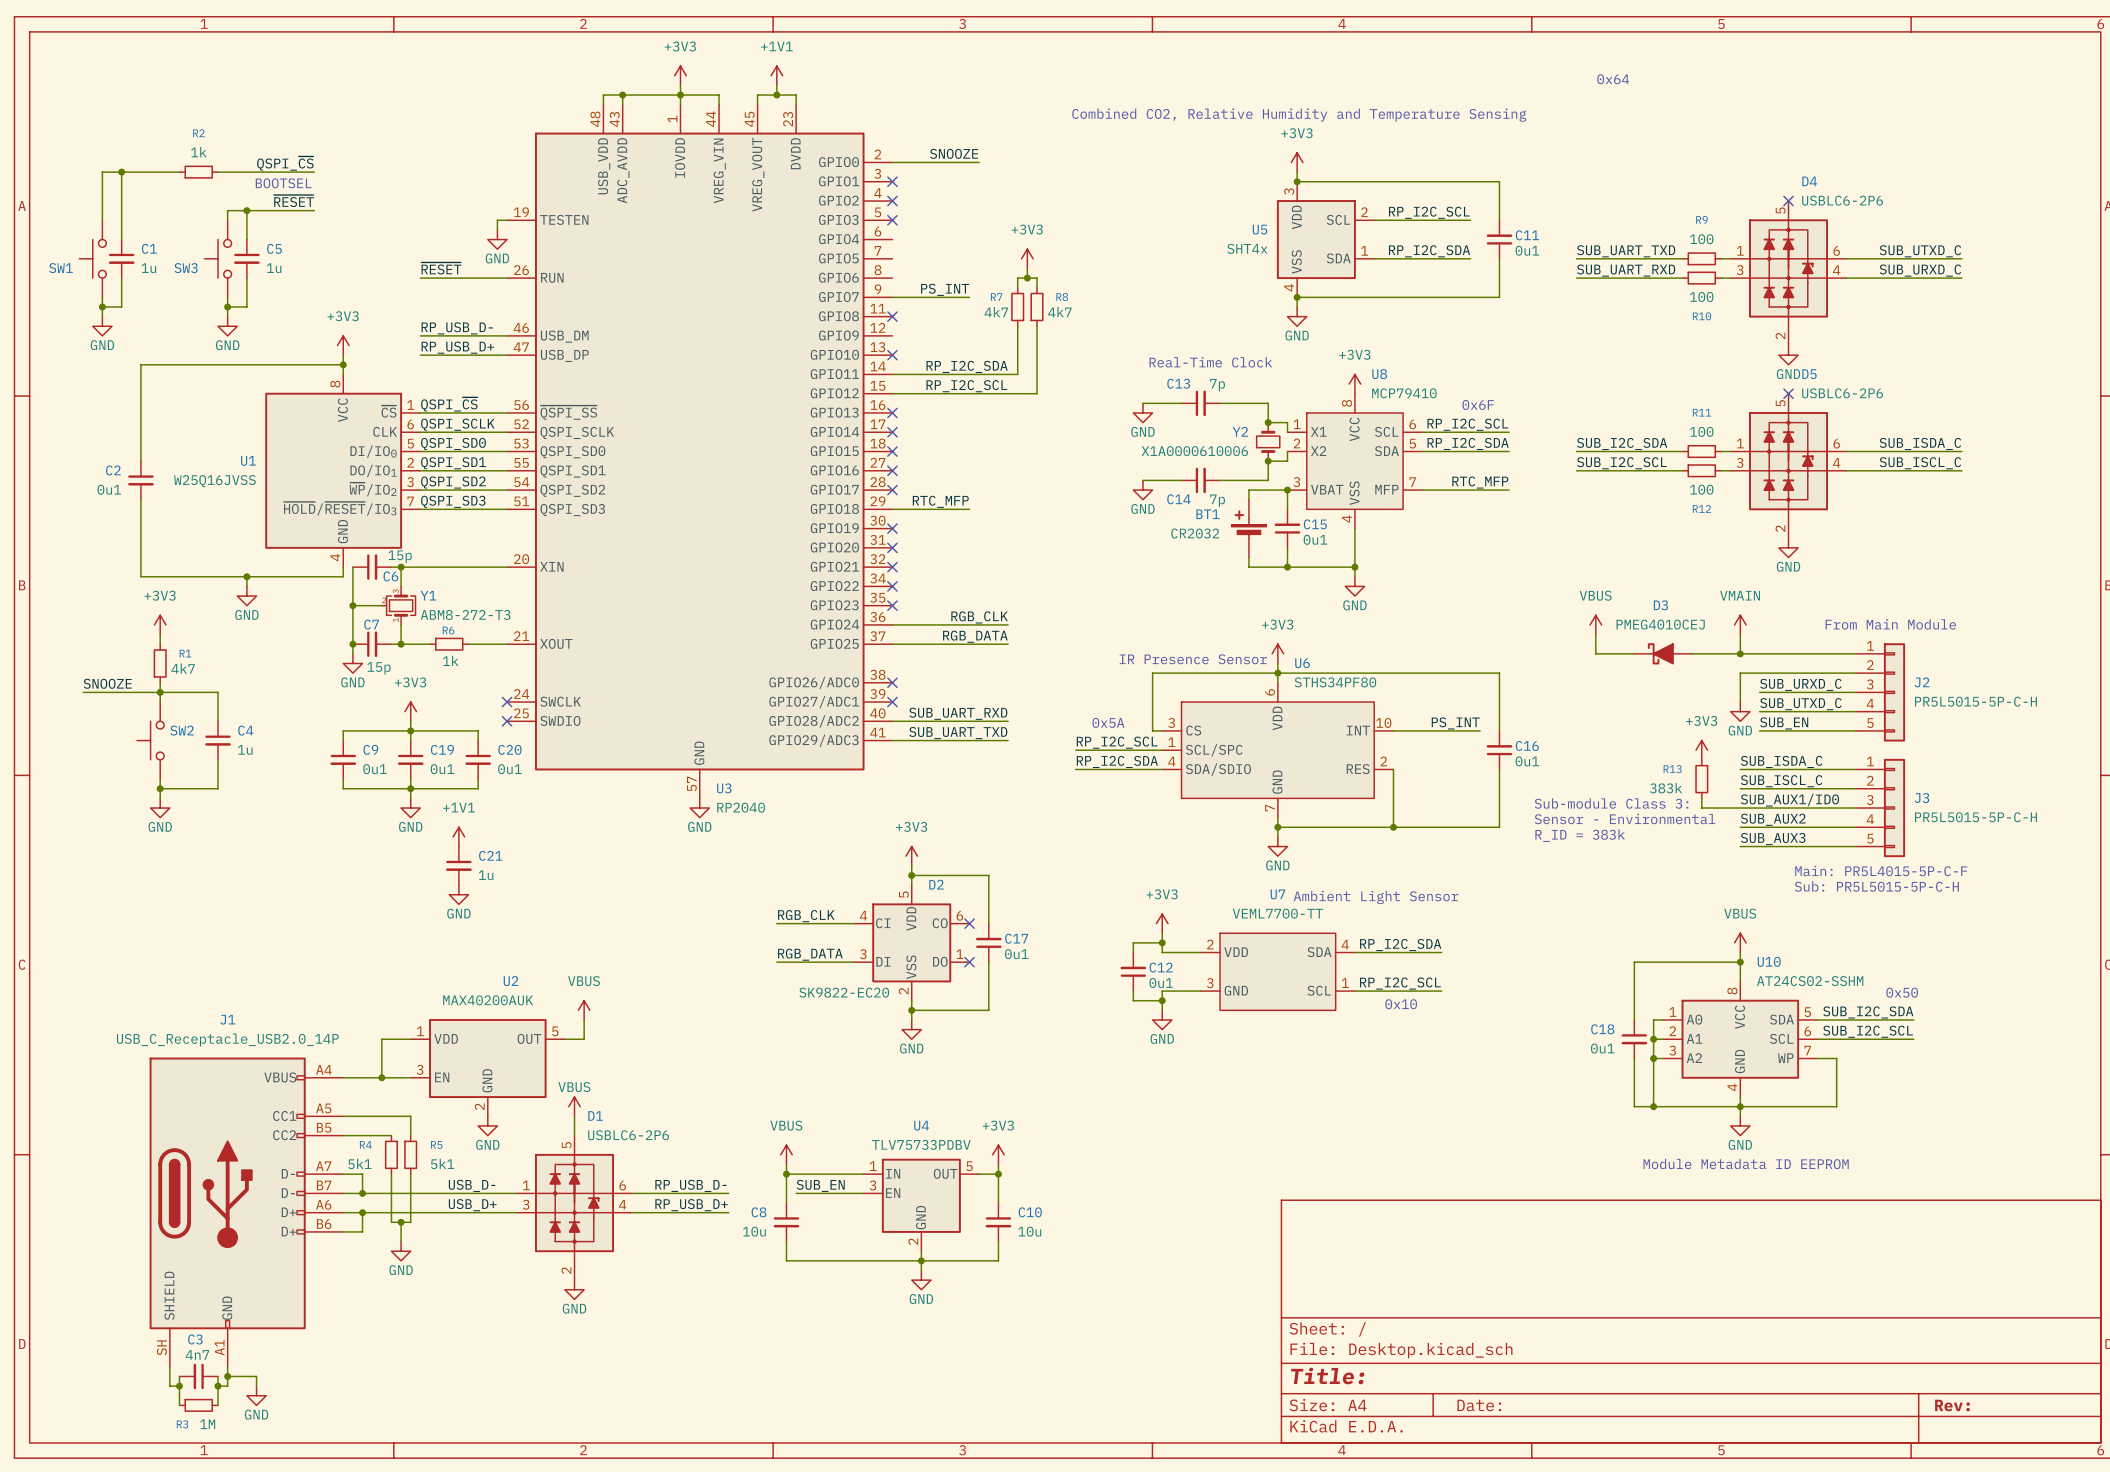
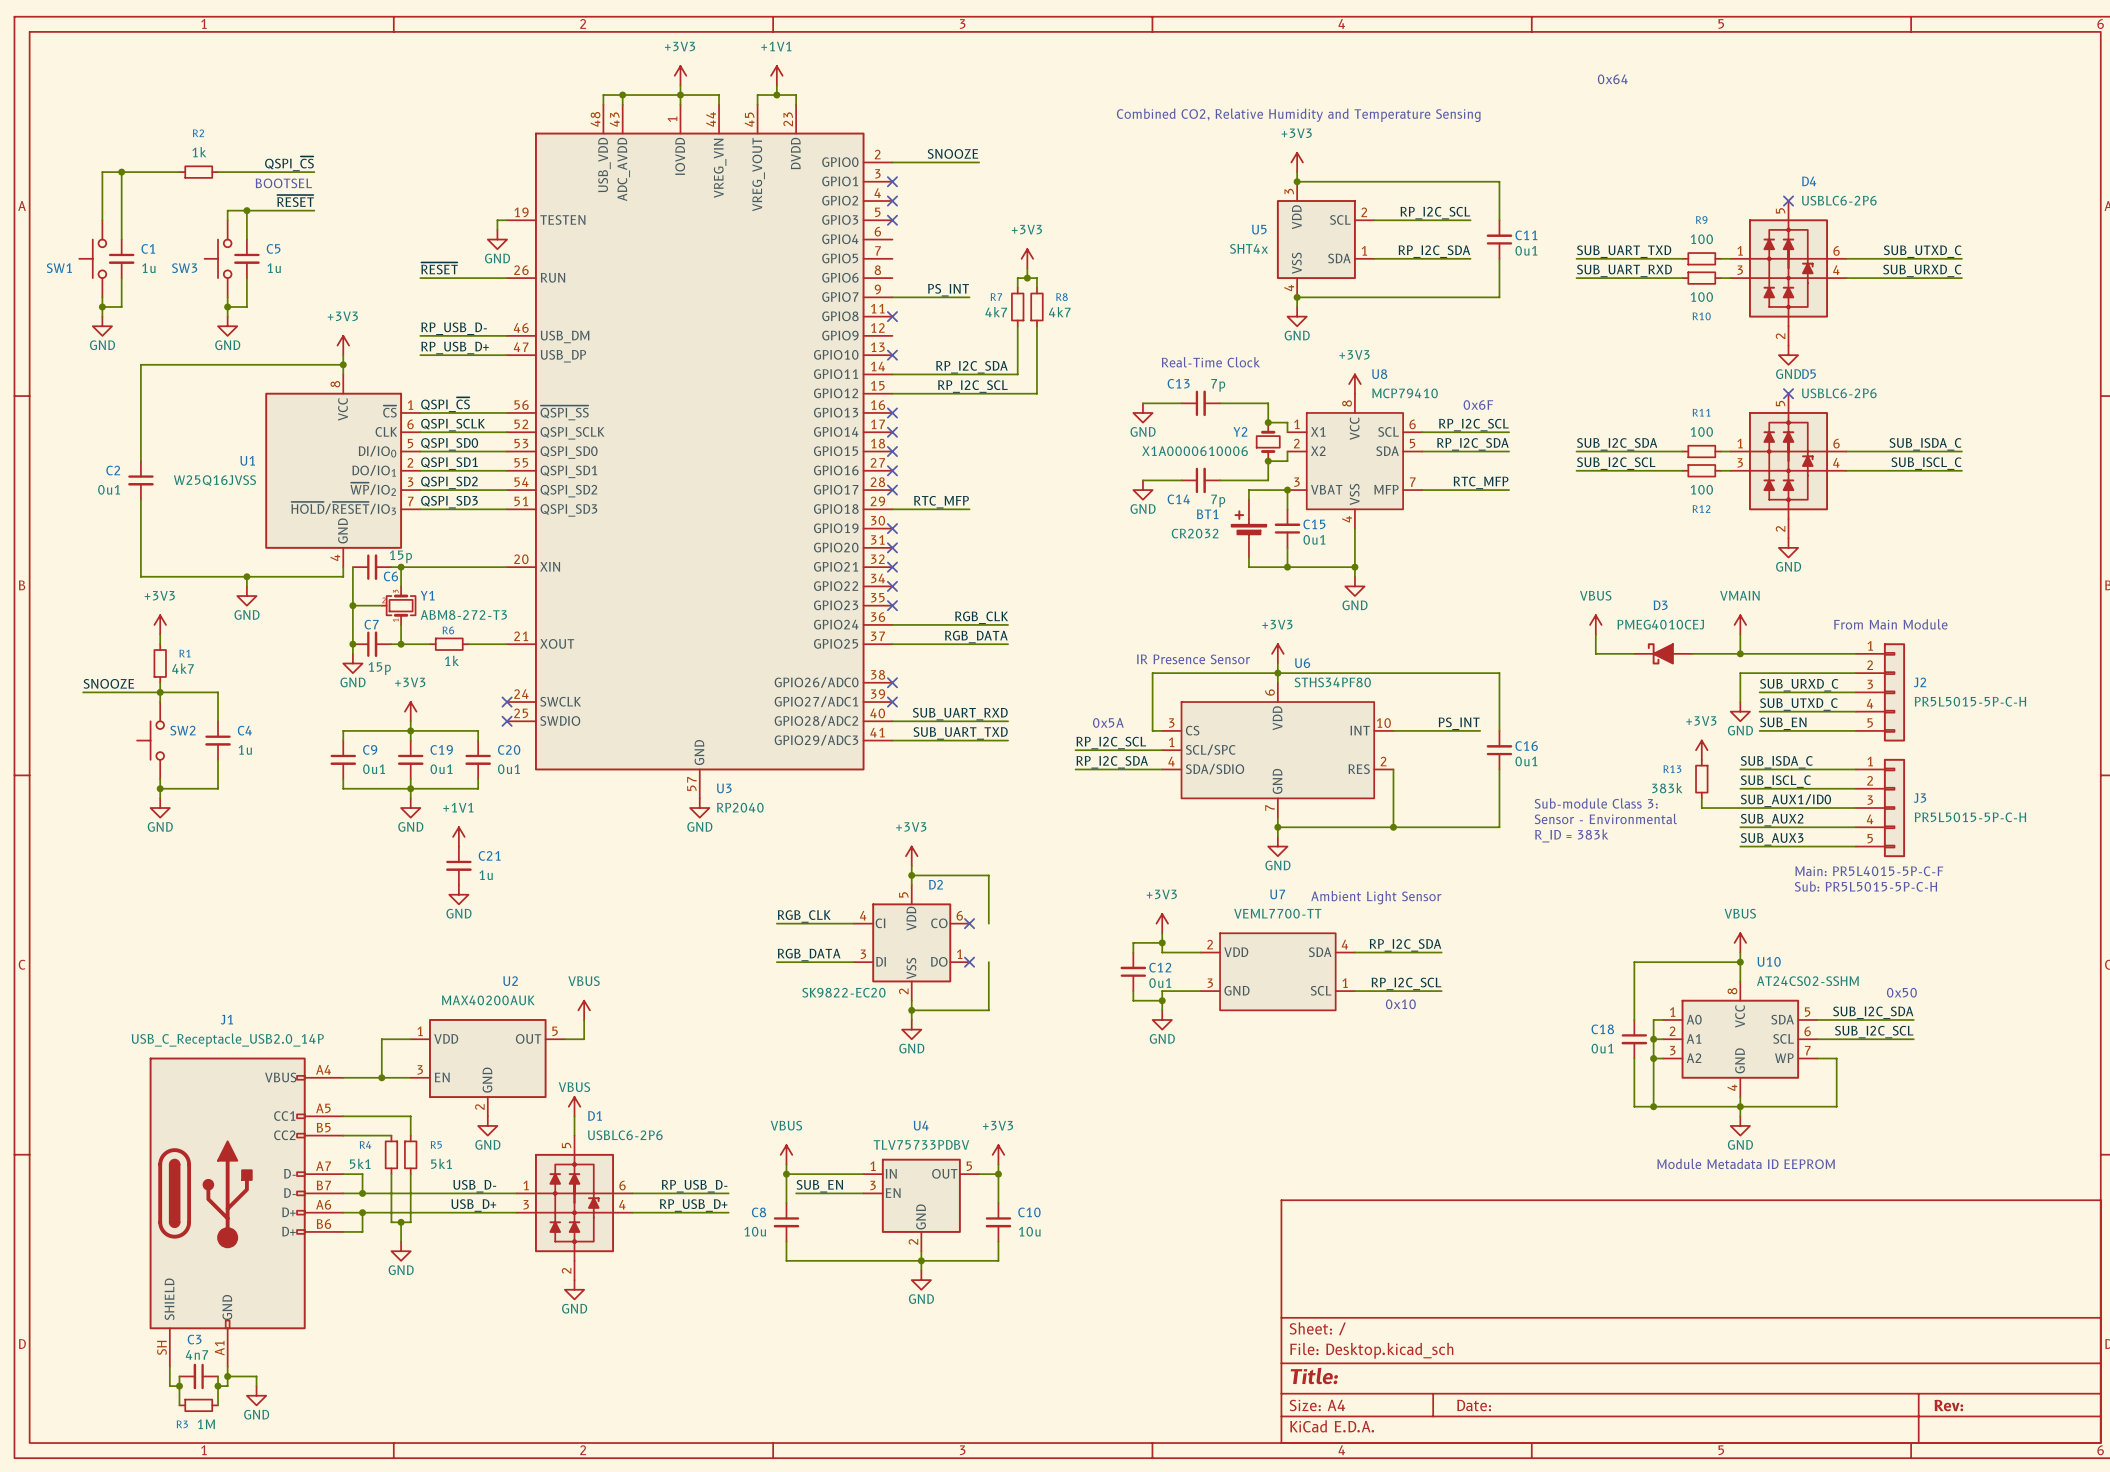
C17: 0u1 (988, 942) -> none

